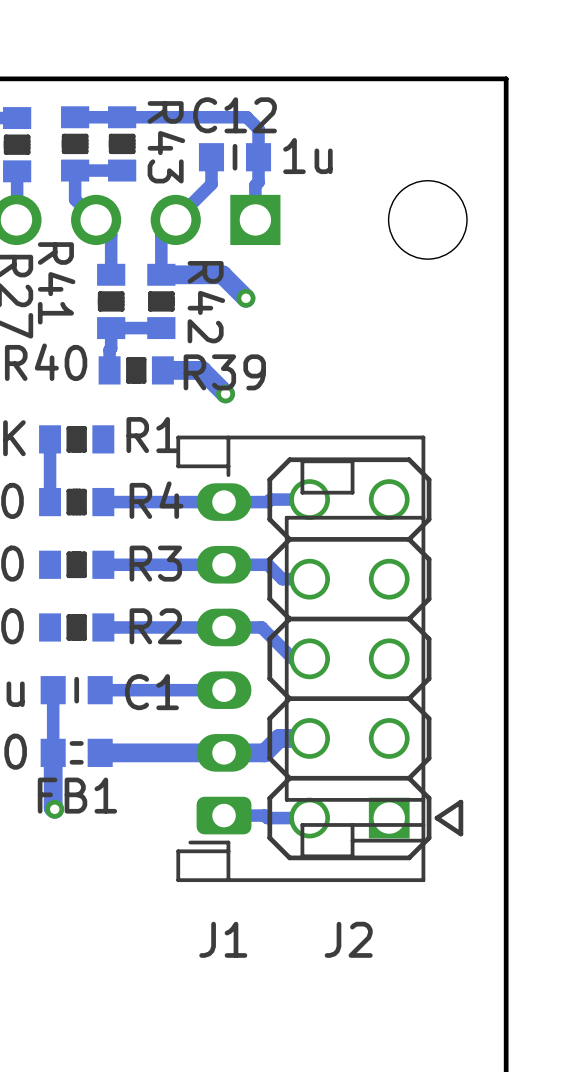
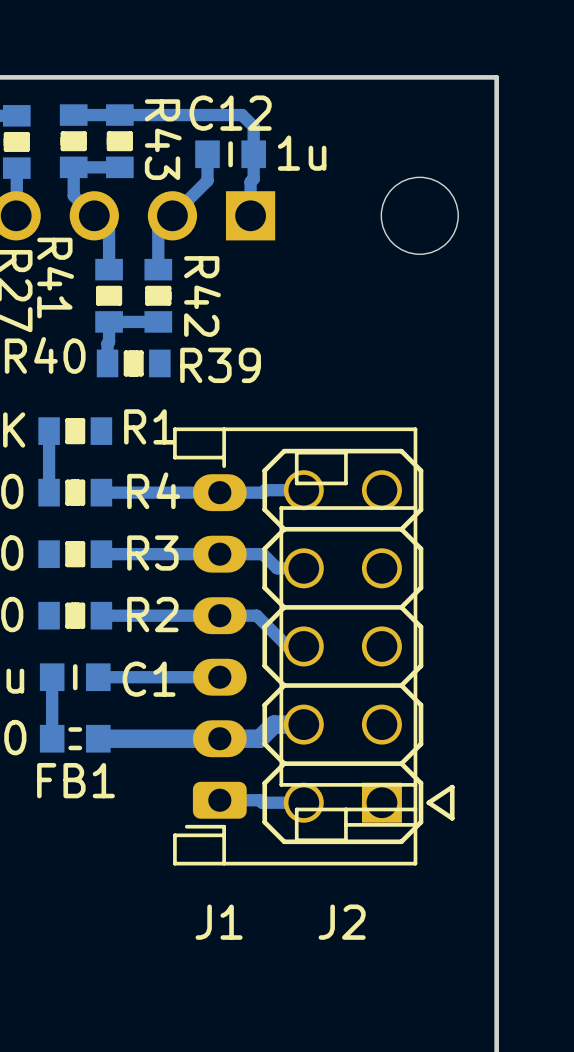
track: (161, 274) (222, 274) (245, 298) -> none
via: (245, 298) -> none
track: (162, 370) (202, 370) (225, 393) -> none
via: (225, 393) -> none
track: (53, 752) (53, 807) (54, 809) -> none
via: (54, 809) -> none

